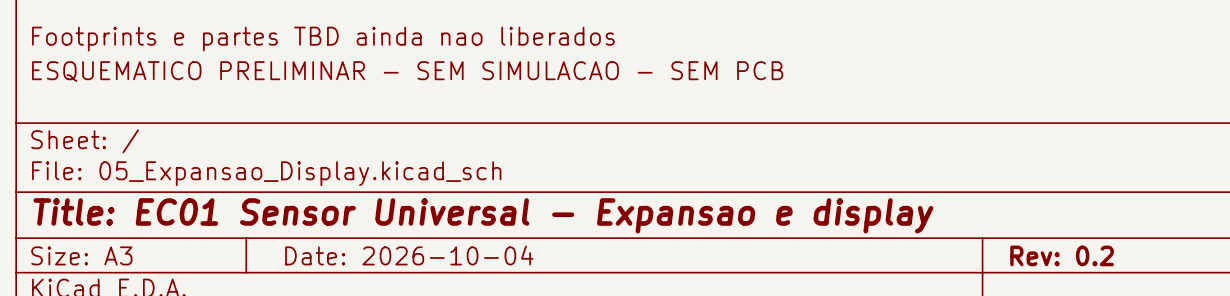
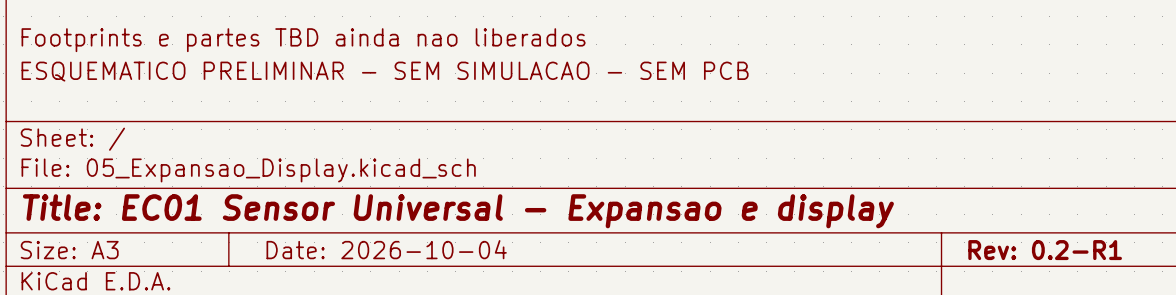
title block: Rev: 0.2 (1062, 255) -> Rev: 0.2-R1 (1045, 250)

